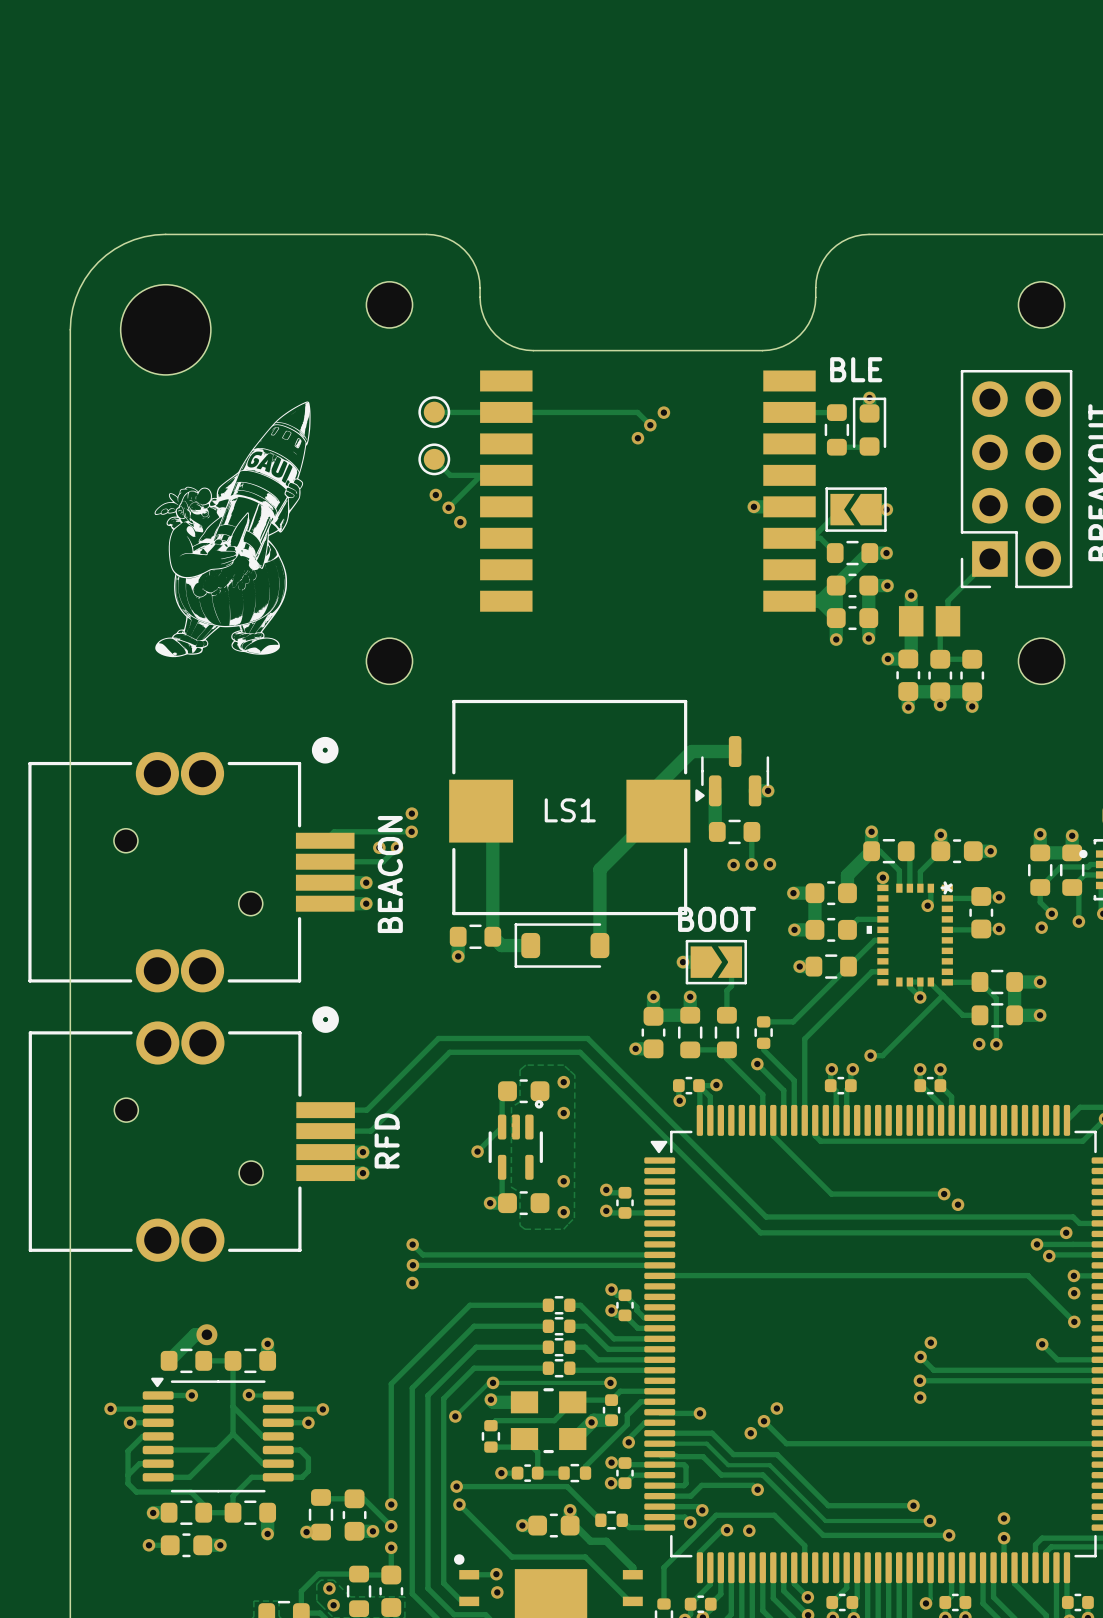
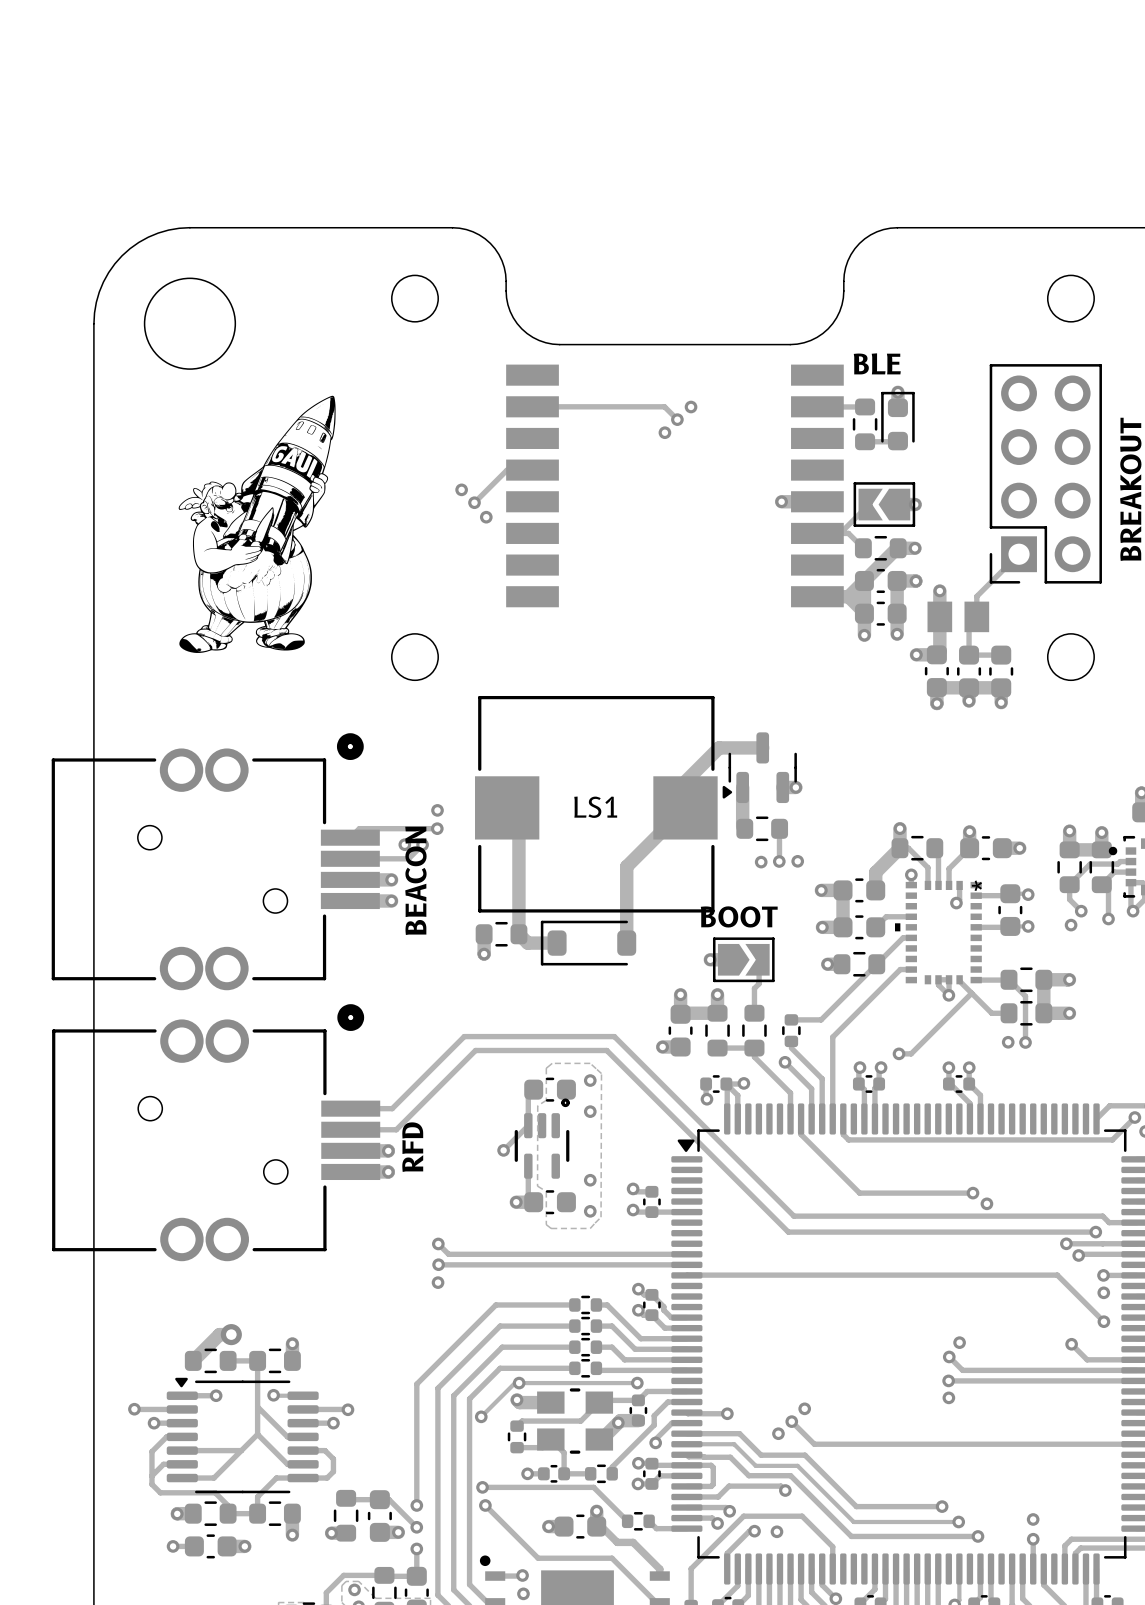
track: (434, 412) (506, 412) -> none
part: (434, 412) -> none
track: (434, 459) (450, 475) (481, 475) -> none
part: (434, 459) -> none

